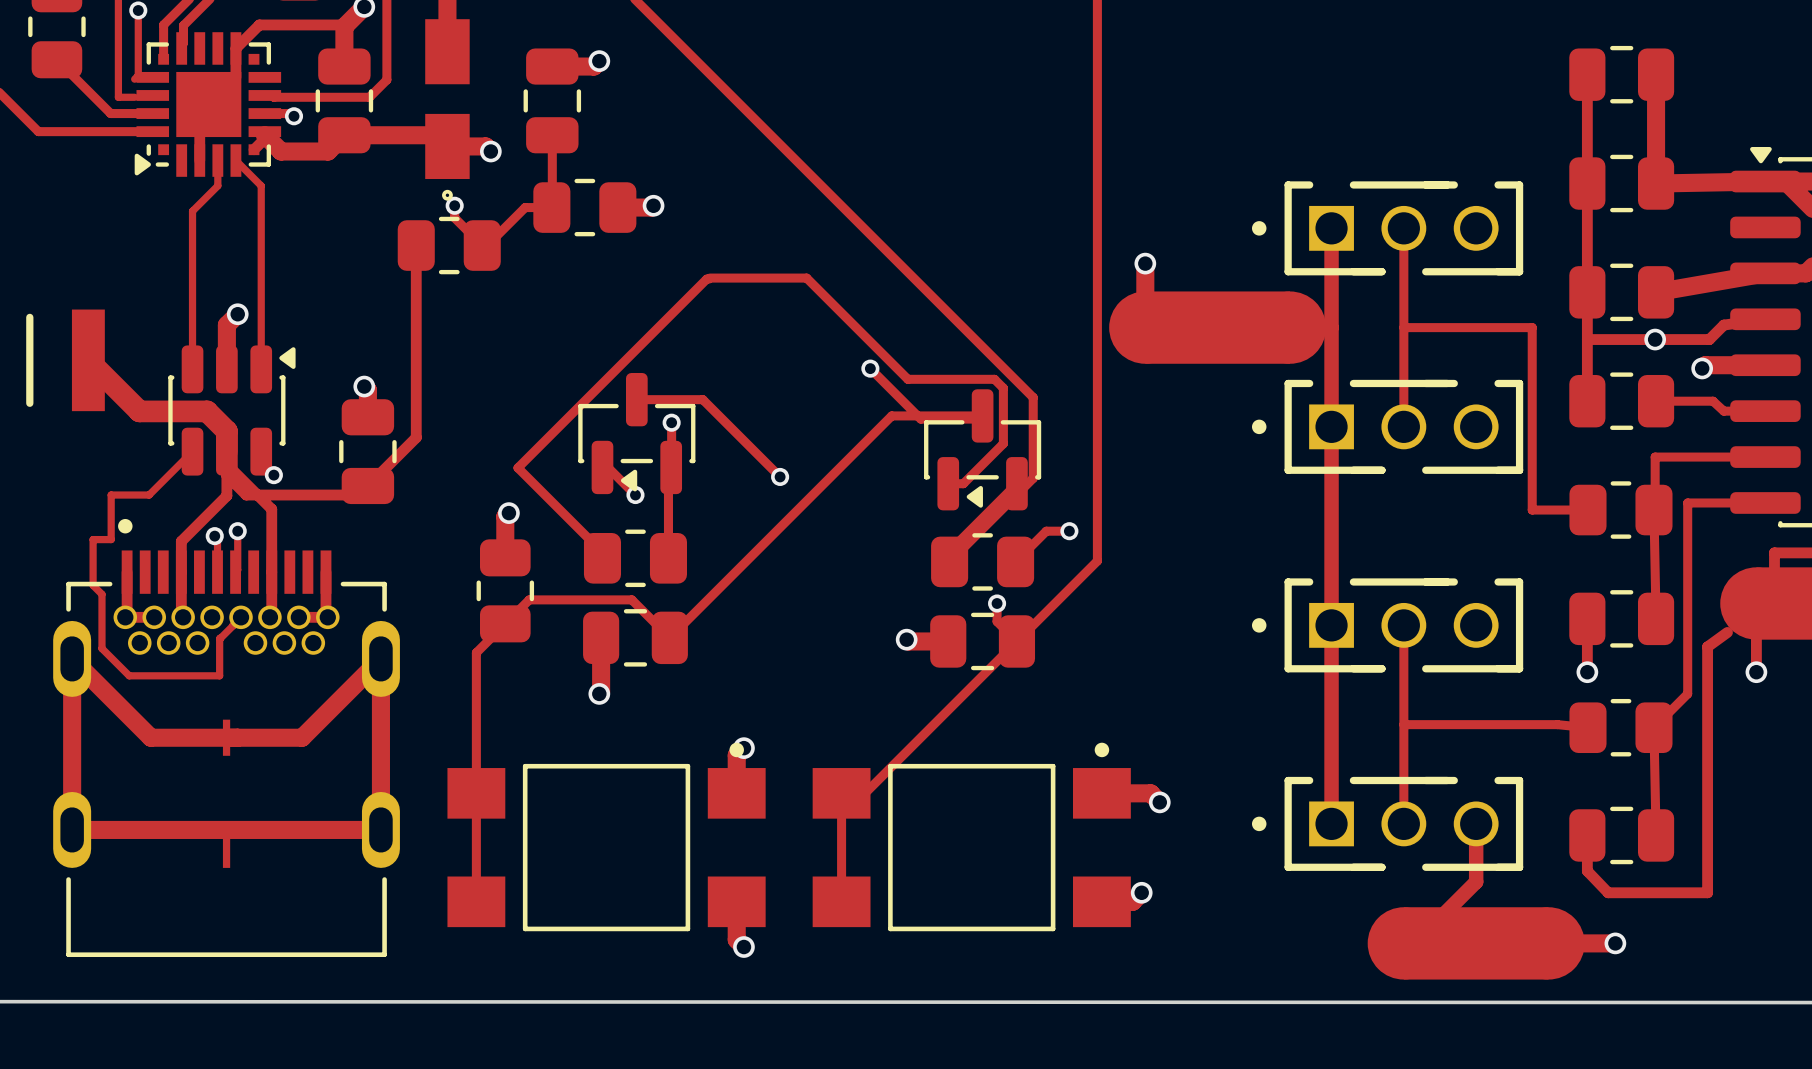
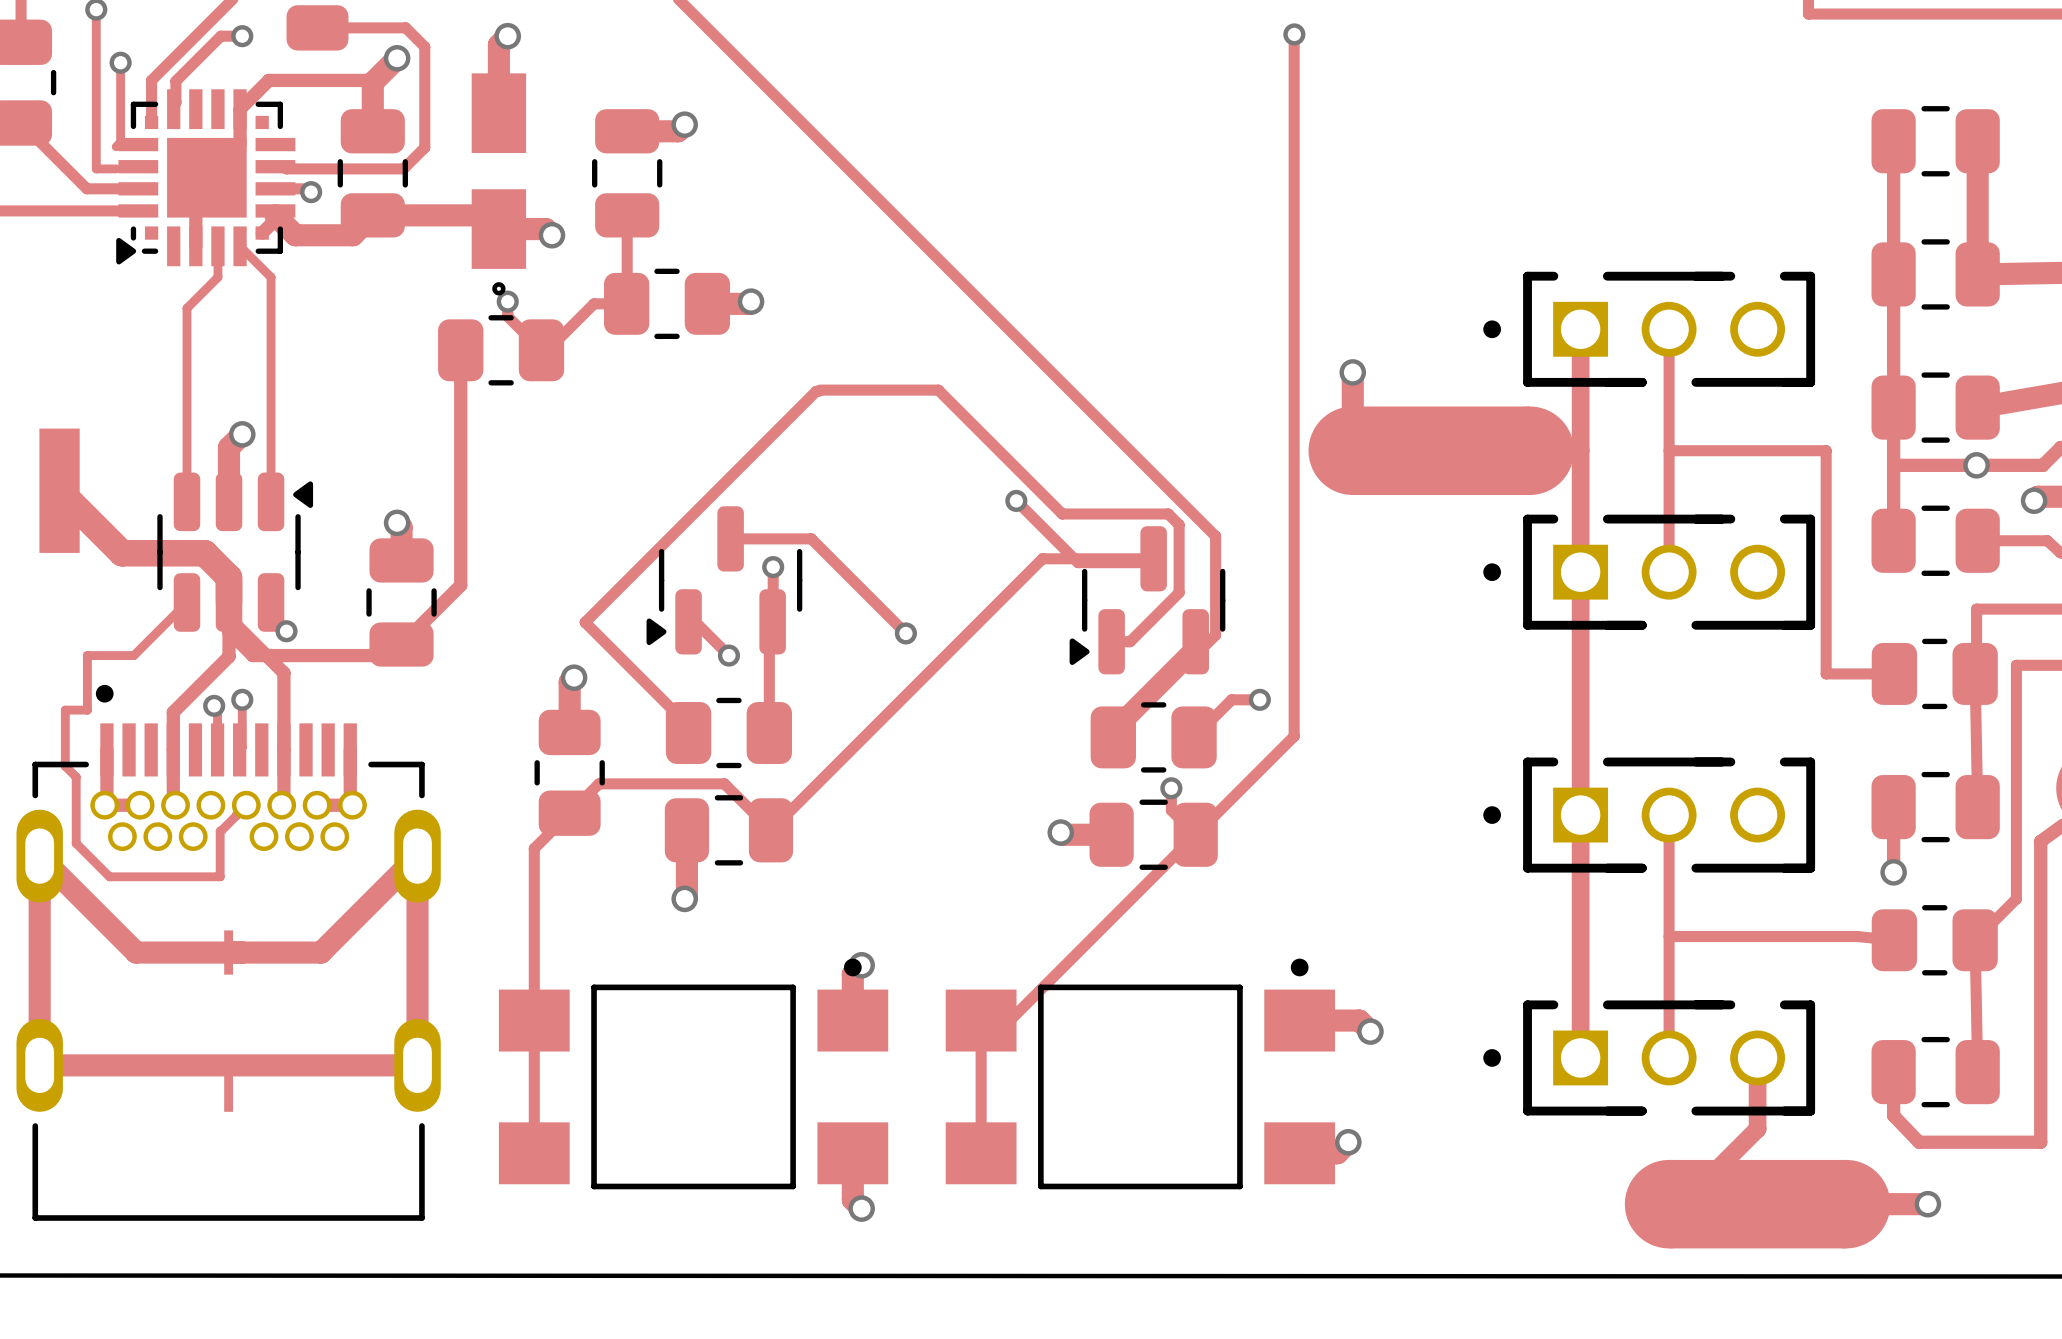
part footprint: [168, 345, 296, 476] -> [157, 472, 314, 632]
part footprint: [578, 372, 696, 495] -> [646, 506, 803, 655]
part footprint: [924, 389, 1042, 511] -> [1069, 526, 1226, 675]

